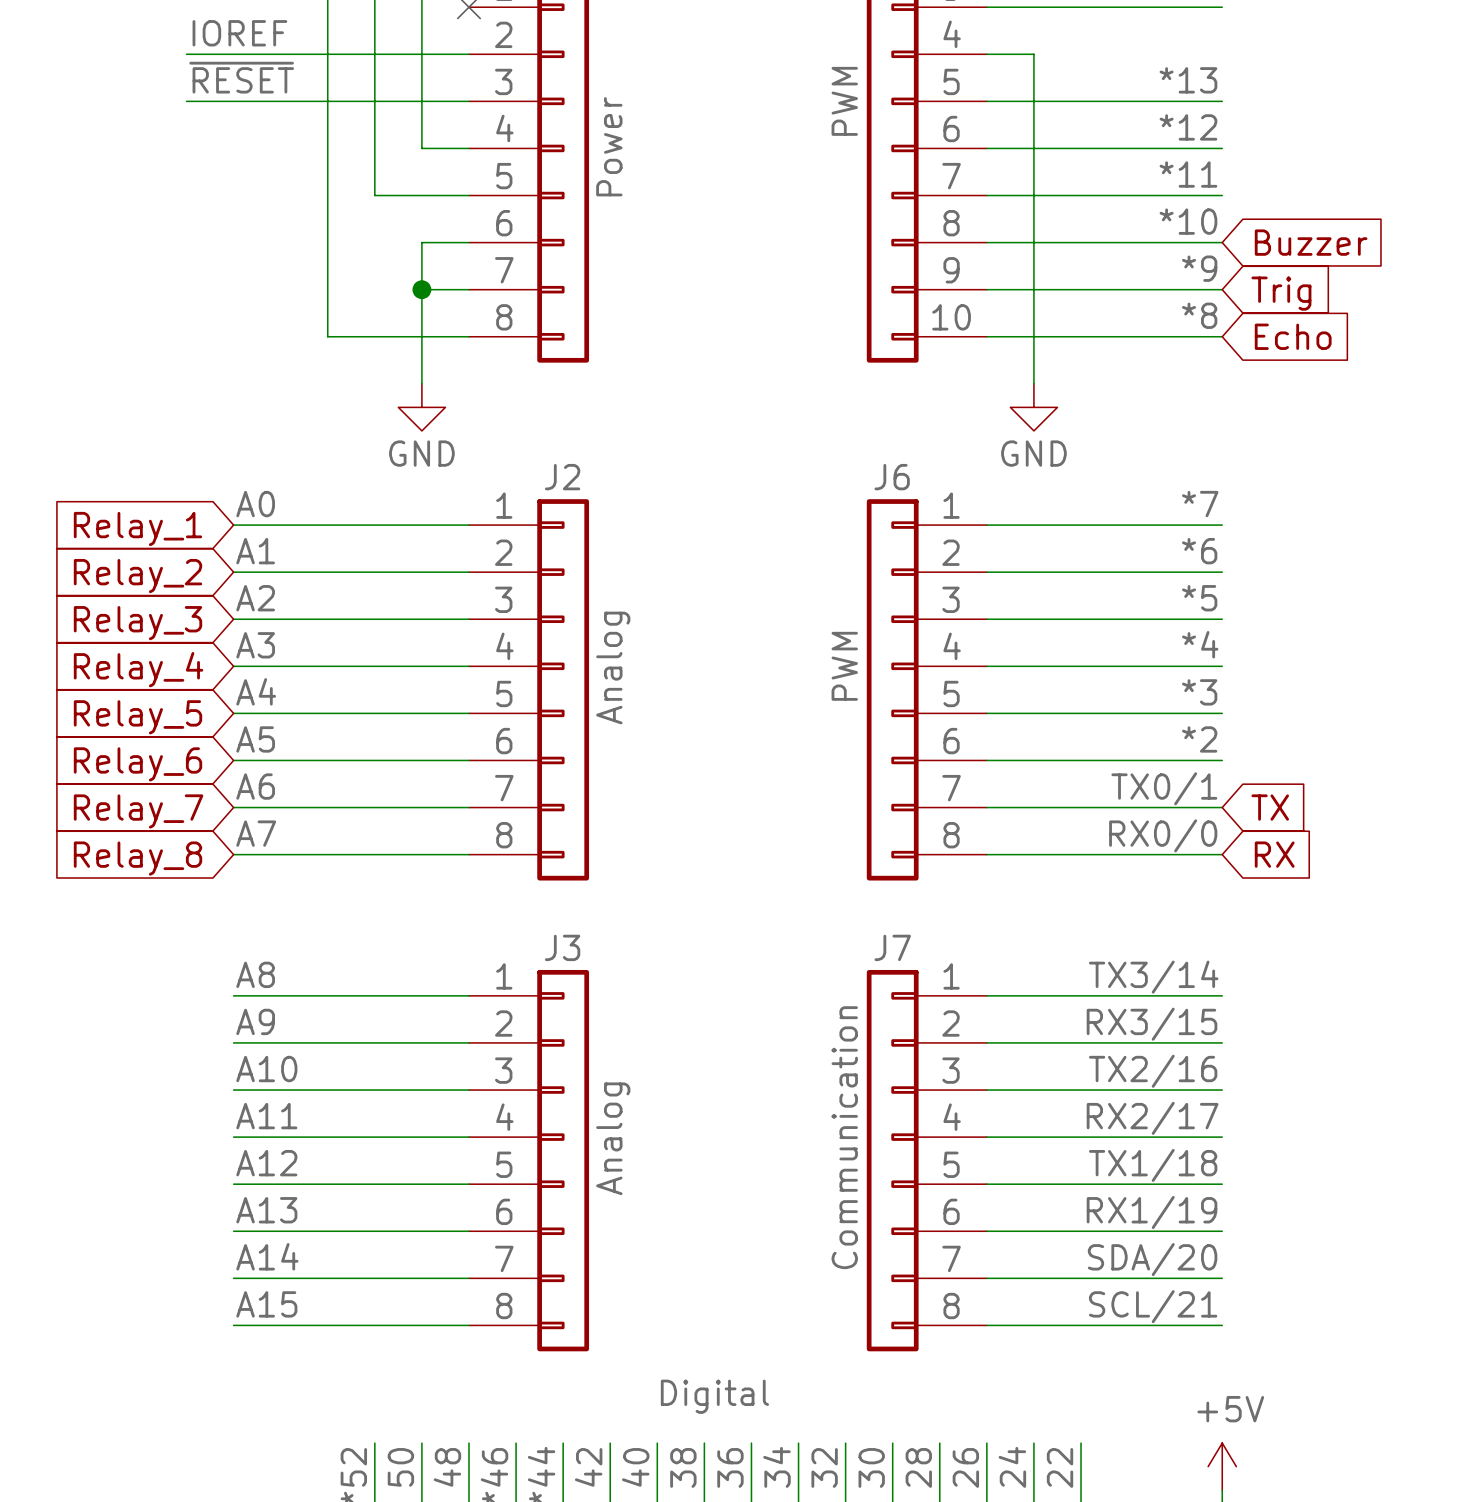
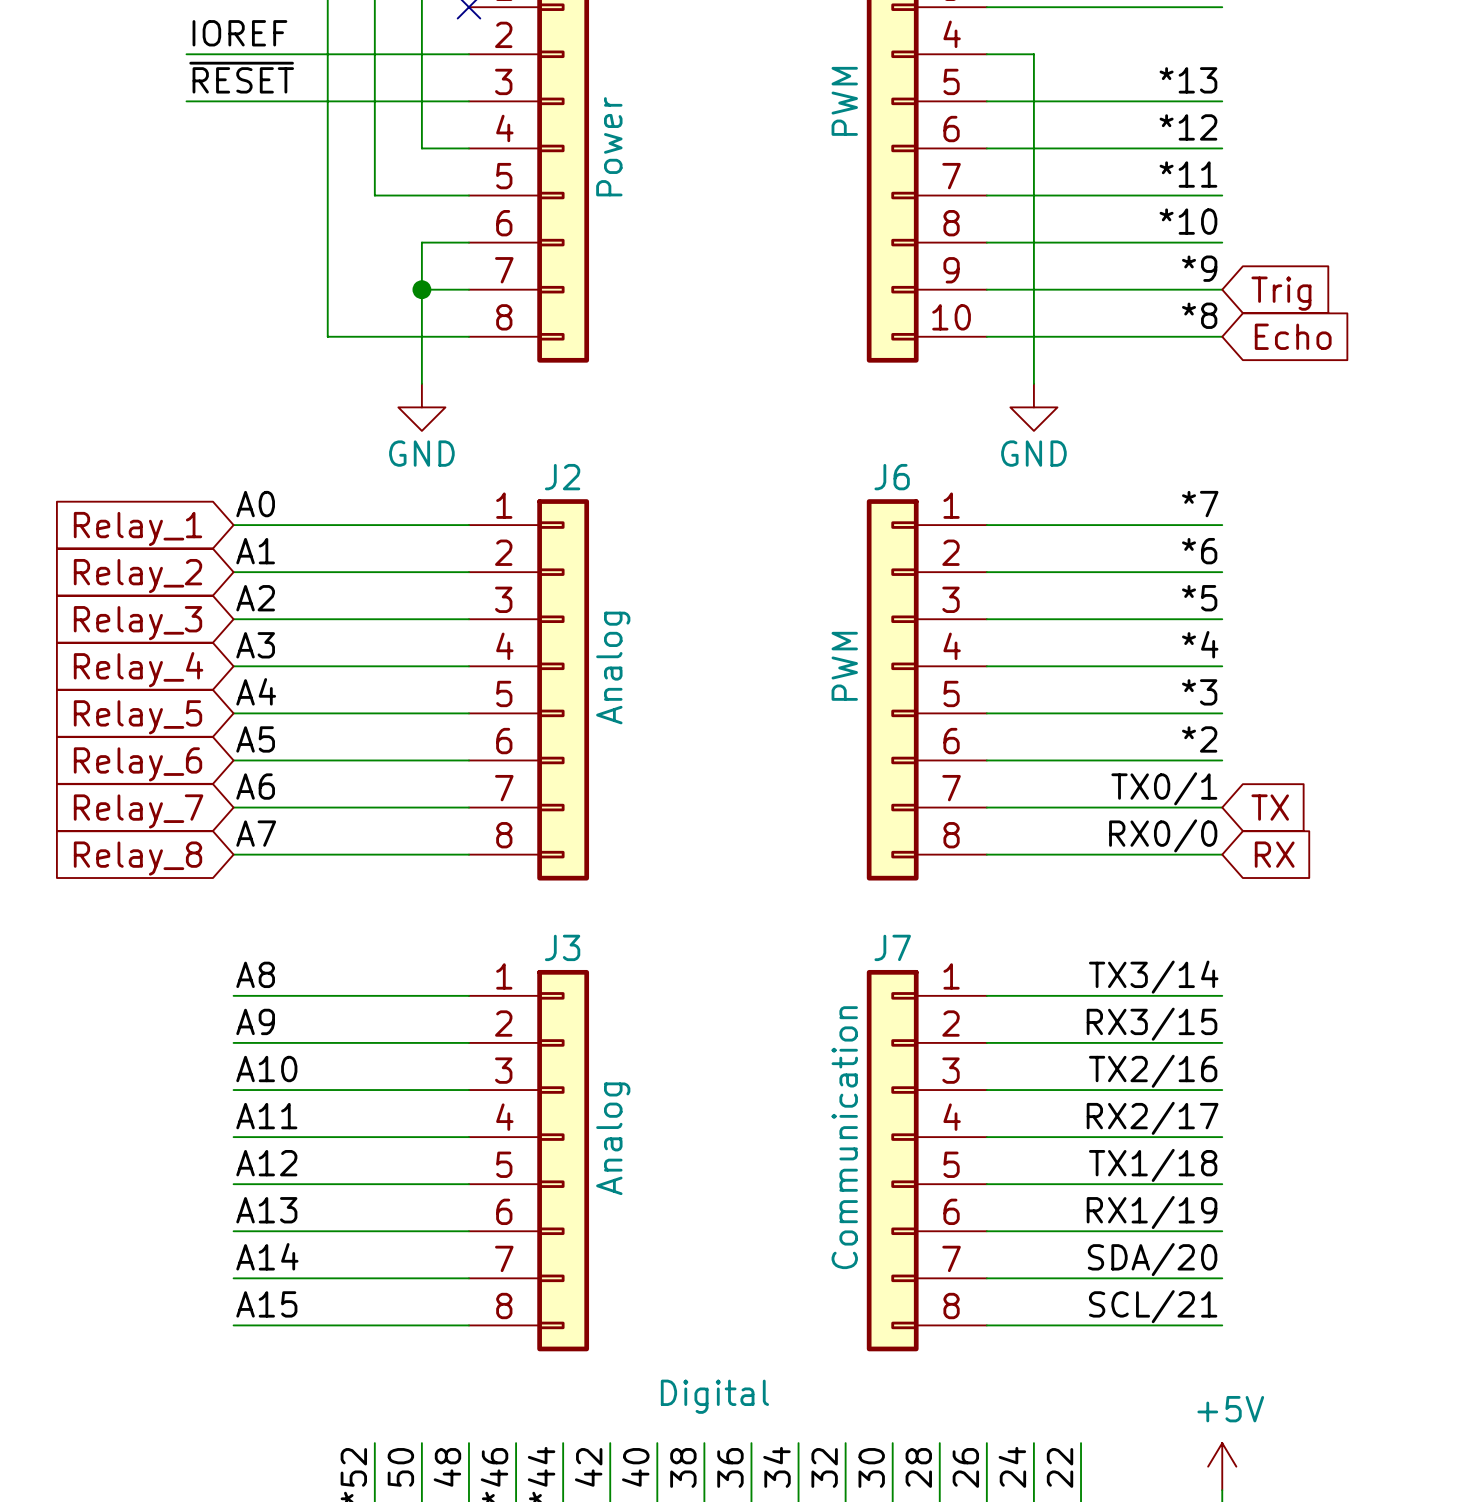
global label: Buzzer (1311, 242) -> none

